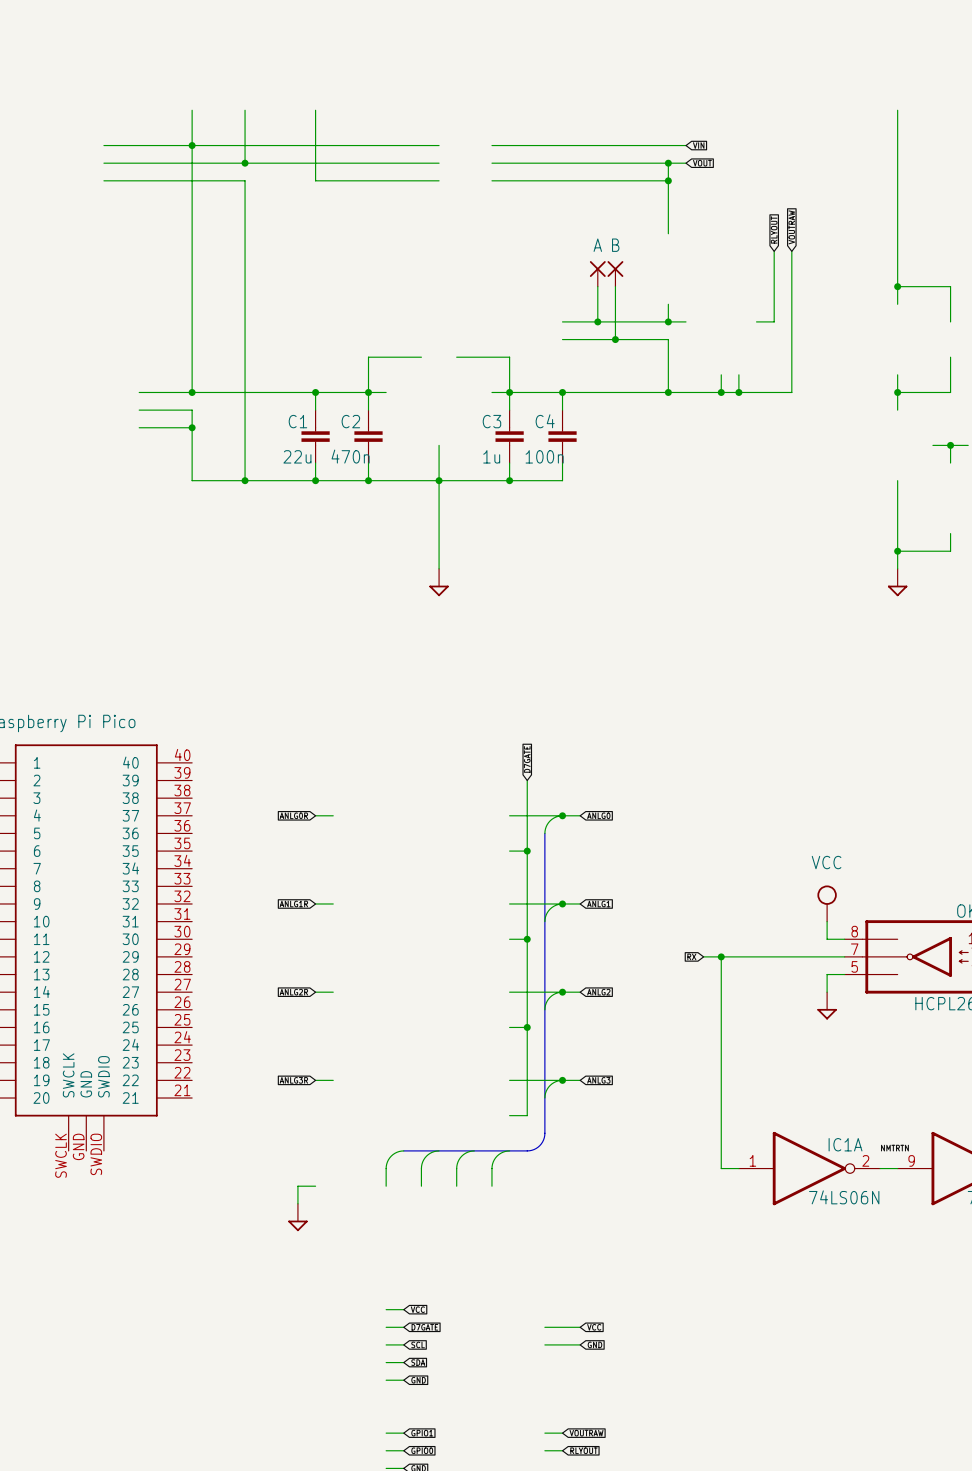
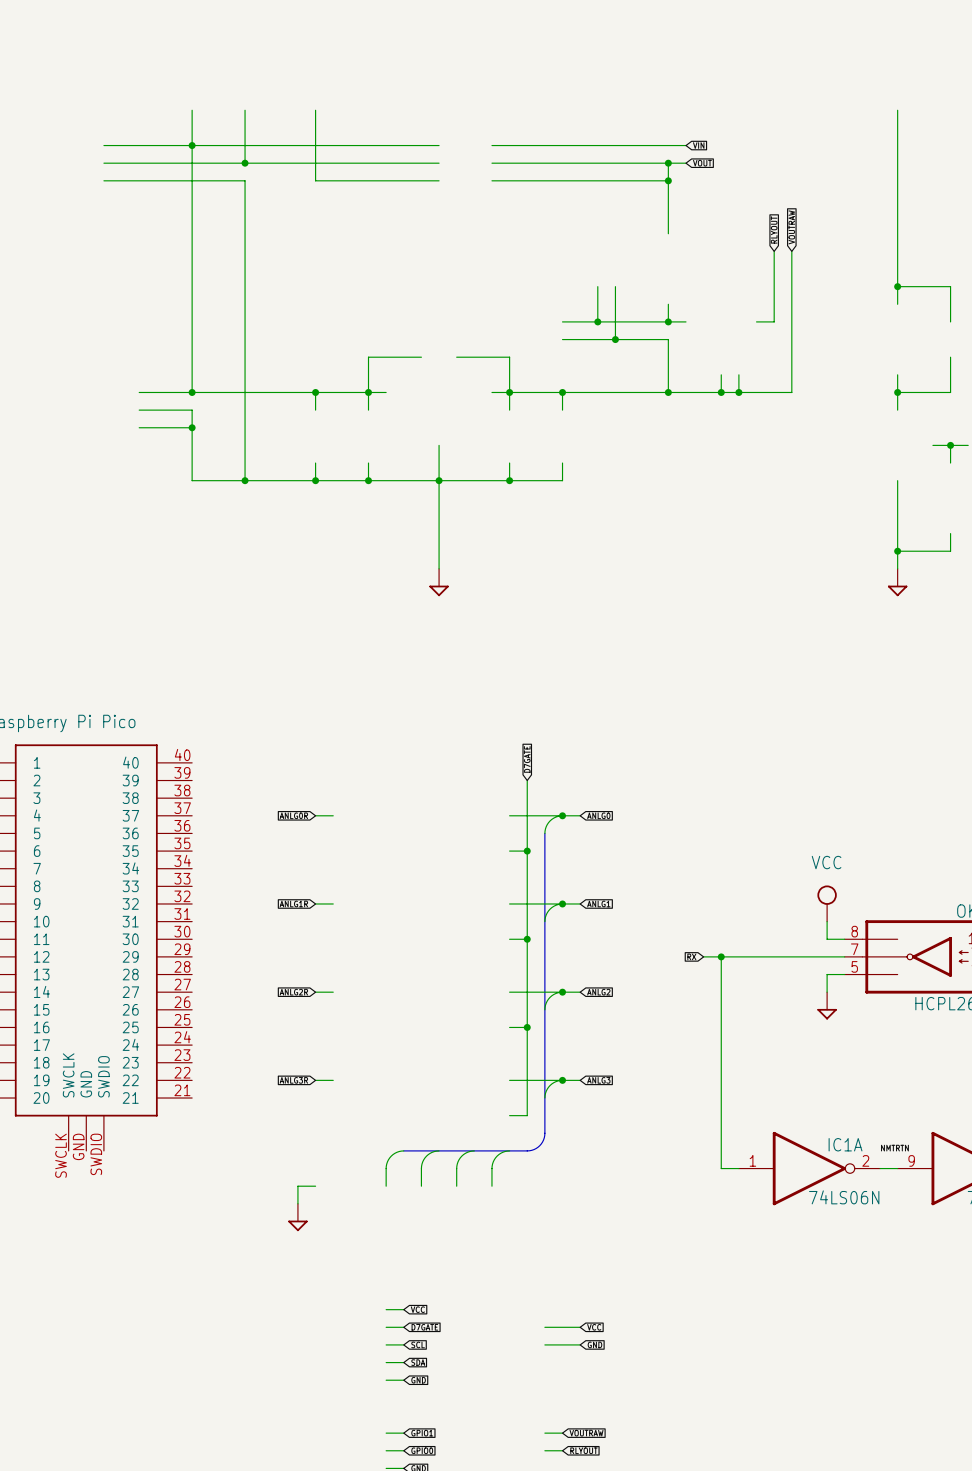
A: (597, 273) -> none
B: (615, 273) -> none
C1: 22u (315, 436) -> none
C2: 470n (368, 436) -> none
C3: 1u (509, 436) -> none
C4: 100n (562, 436) -> none

